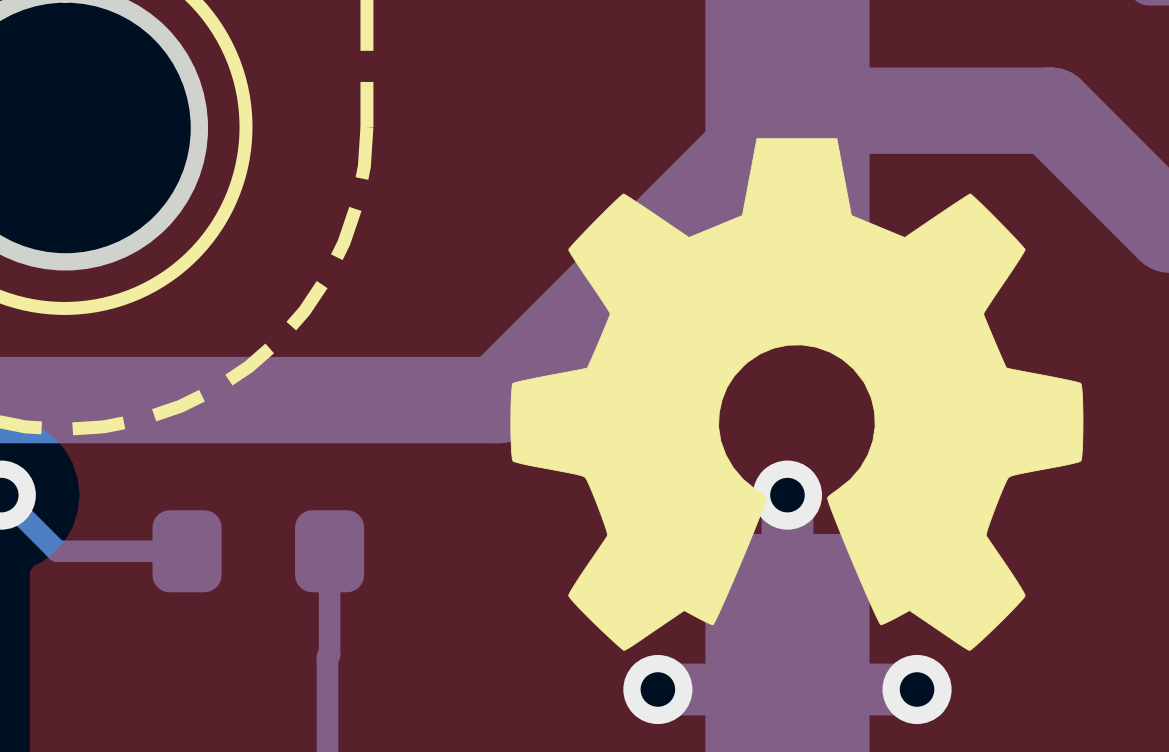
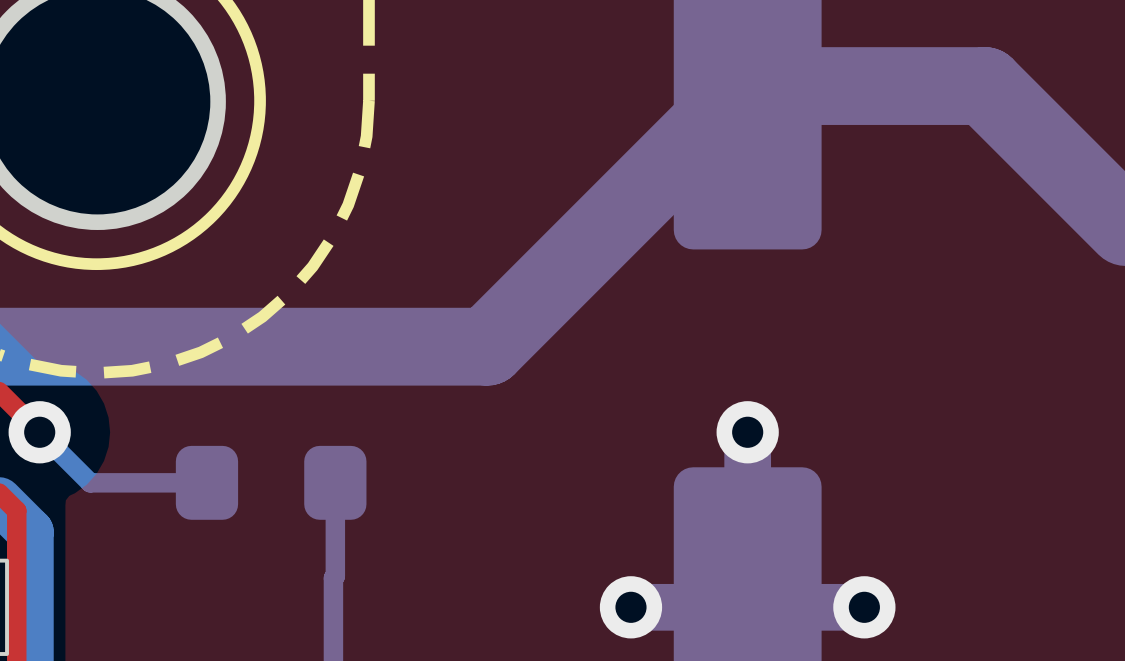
drawing: [510, 138, 1084, 651] -> none

